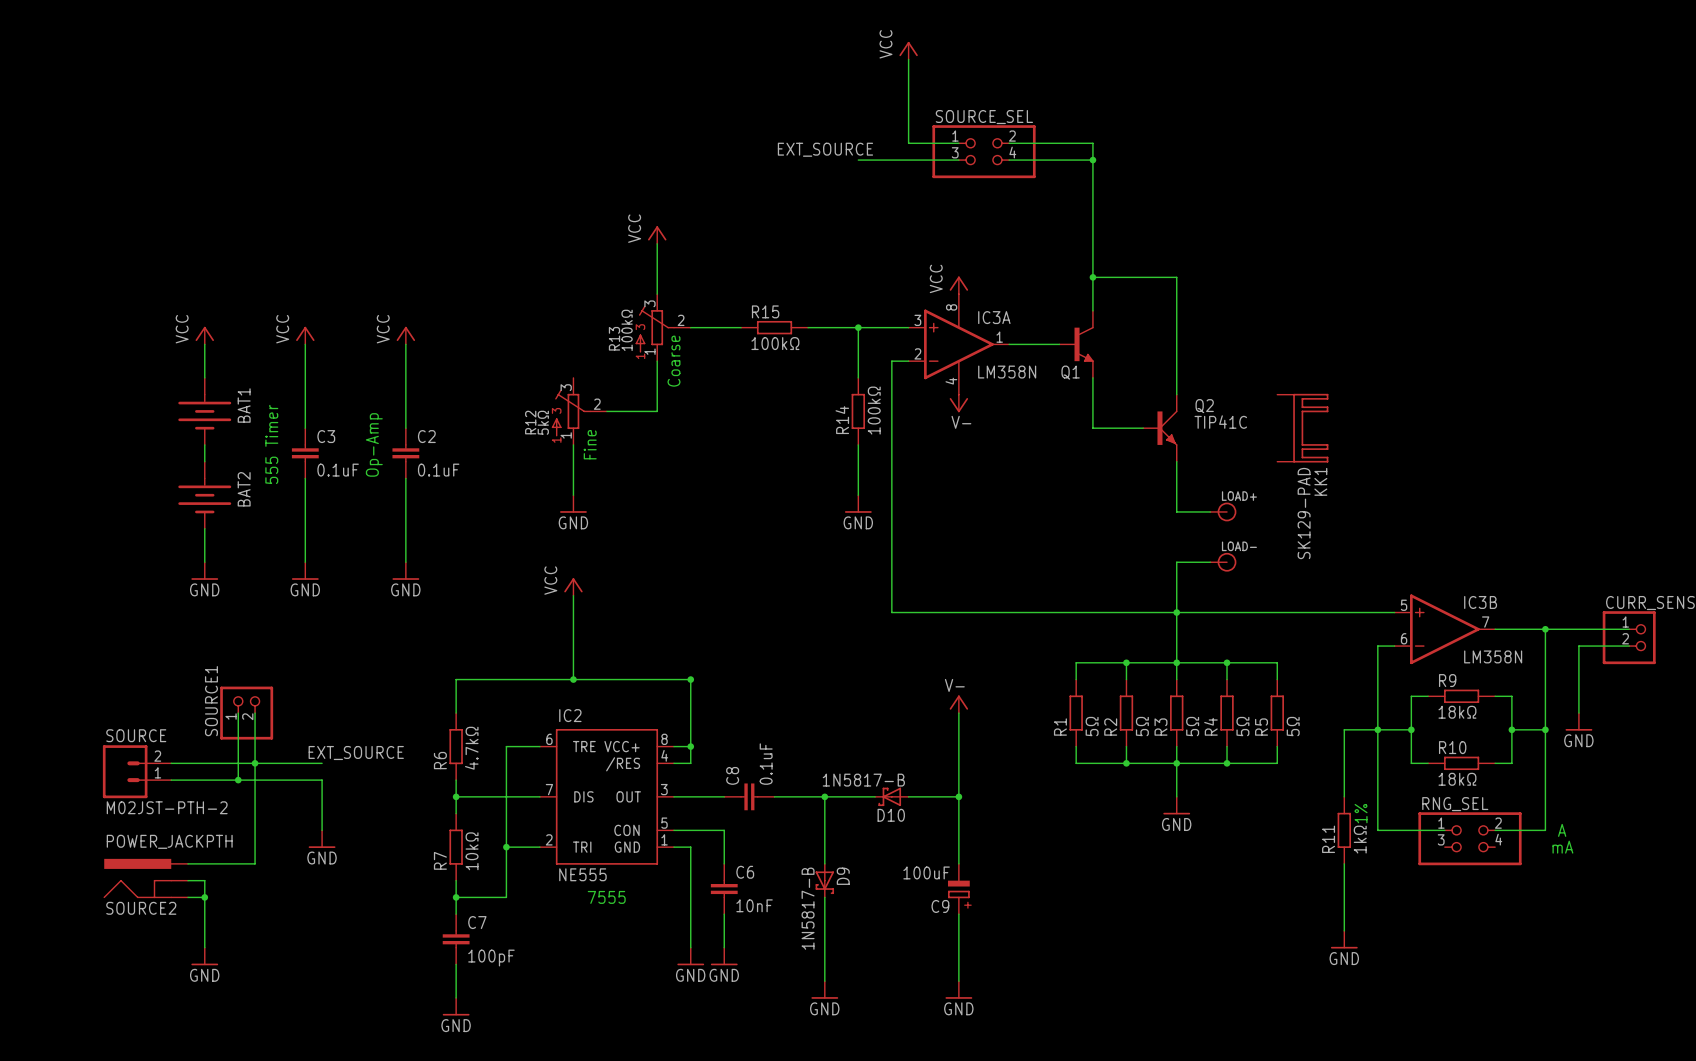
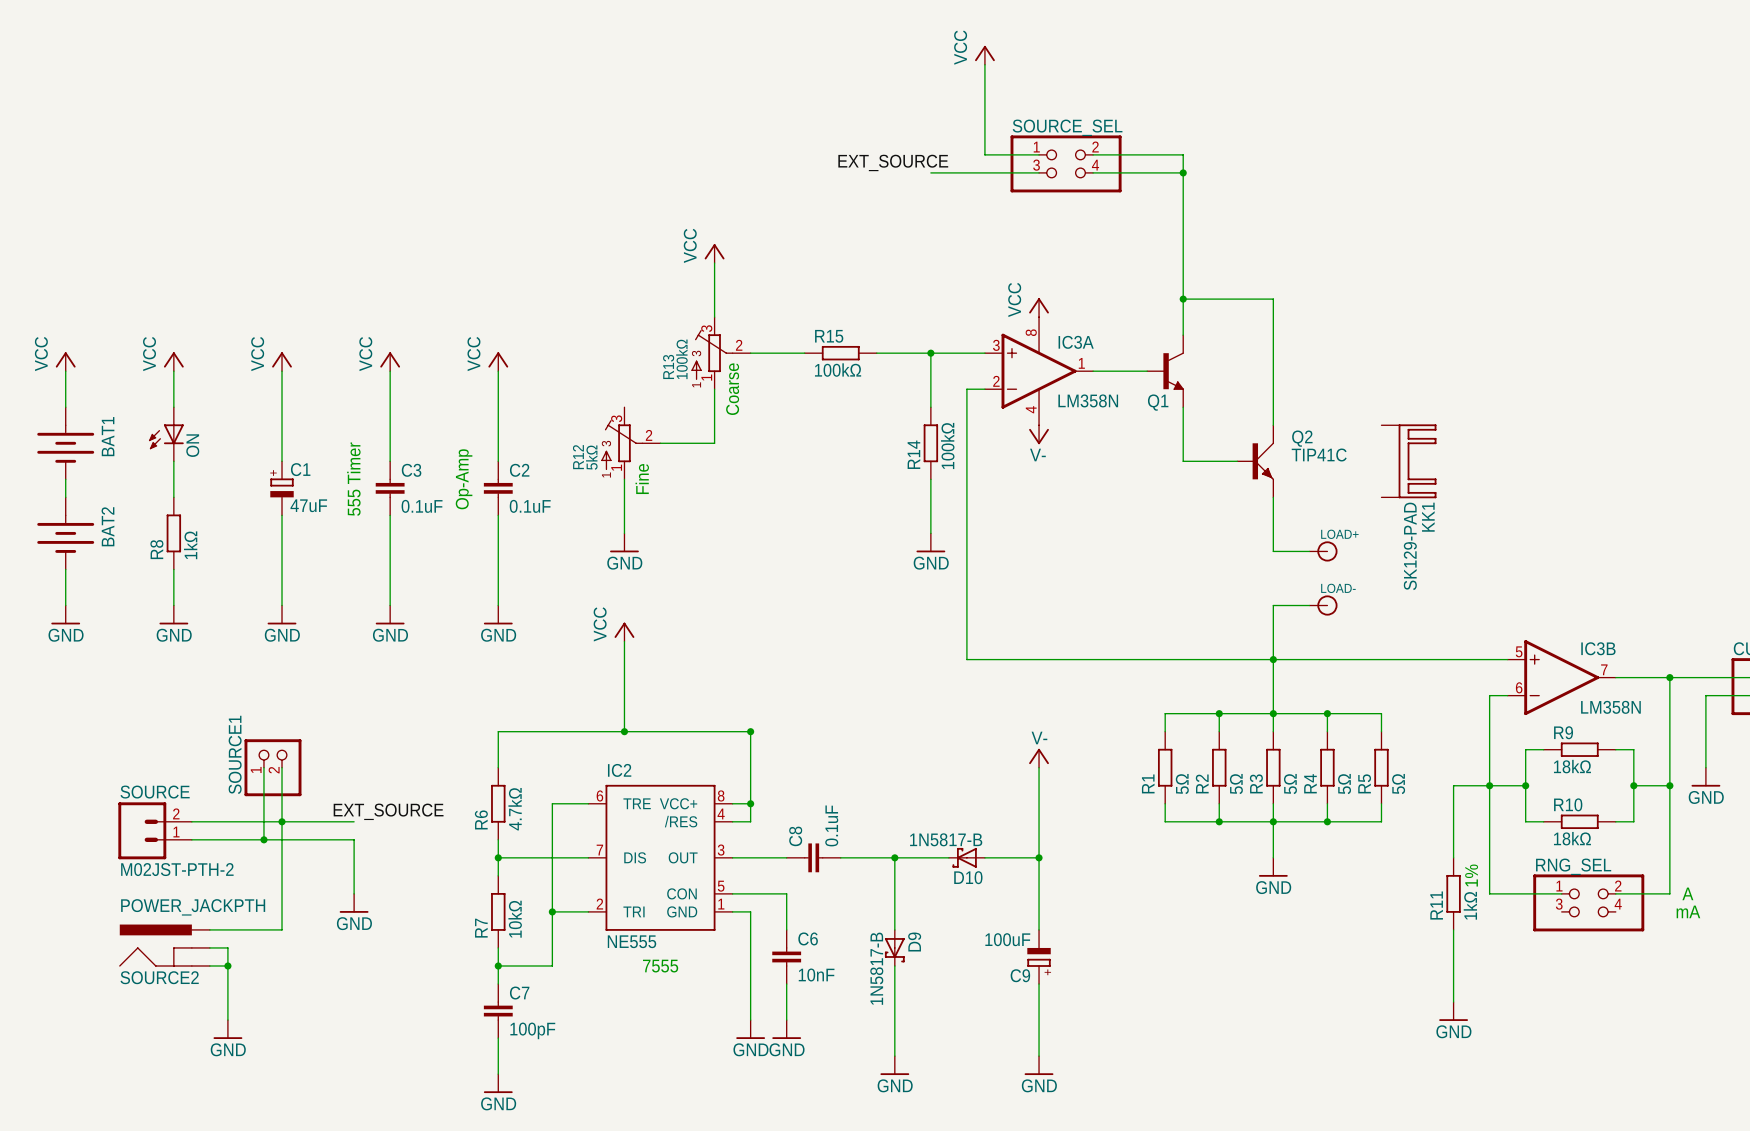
power symbol: none -> VCC (65, 361)
power symbol: none -> VCC (173, 361)
power symbol: VCC (204, 335) -> none
power symbol: none -> VCC (282, 361)
power symbol: VCC (305, 335) -> none
power symbol: none -> VCC (390, 361)
power symbol: VCC (405, 335) -> none
power symbol: none -> VCC (498, 361)
wire: none -> (65, 371) (65, 407)
wire: (204, 344) (204, 377) -> (173, 371) (173, 407)
wire: (305, 344) (305, 428) -> (282, 371) (282, 461)
wire: (405, 344) (405, 428) -> (390, 371) (390, 461)
wire: none -> (498, 371) (498, 461)
ON: none -> (166, 434)
BAT1 position: (204, 411) -> (65, 443)
wire: none -> (173, 461) (173, 497)
wire: (204, 444) (204, 461) -> (65, 479) (65, 497)
text position: 555 Timer (271, 444) -> 555 Timer (353, 479)
text position: Op-Amp (374, 444) -> Op-Amp (464, 479)
C1: none -> 47uF (282, 488)
C3 position: (305, 453) -> (390, 488)
C2 position: (405, 453) -> (498, 488)
wire: (305, 478) (305, 562) -> (282, 515) (282, 605)
wire: (405, 478) (405, 562) -> (390, 515) (390, 605)
wire: none -> (498, 515) (498, 605)
R8: none -> 1kΩ (173, 533)
BAT2 position: (204, 495) -> (65, 533)
wire: none -> (65, 569) (65, 605)
wire: (204, 528) (204, 562) -> (173, 569) (173, 605)
power symbol: none -> GND (65, 614)
power symbol: none -> GND (173, 614)
power symbol: GND (204, 571) -> none
power symbol: none -> GND (282, 614)
power symbol: GND (305, 571) -> none
power symbol: none -> GND (390, 614)
power symbol: GND (405, 571) -> none
power symbol: none -> GND (498, 614)

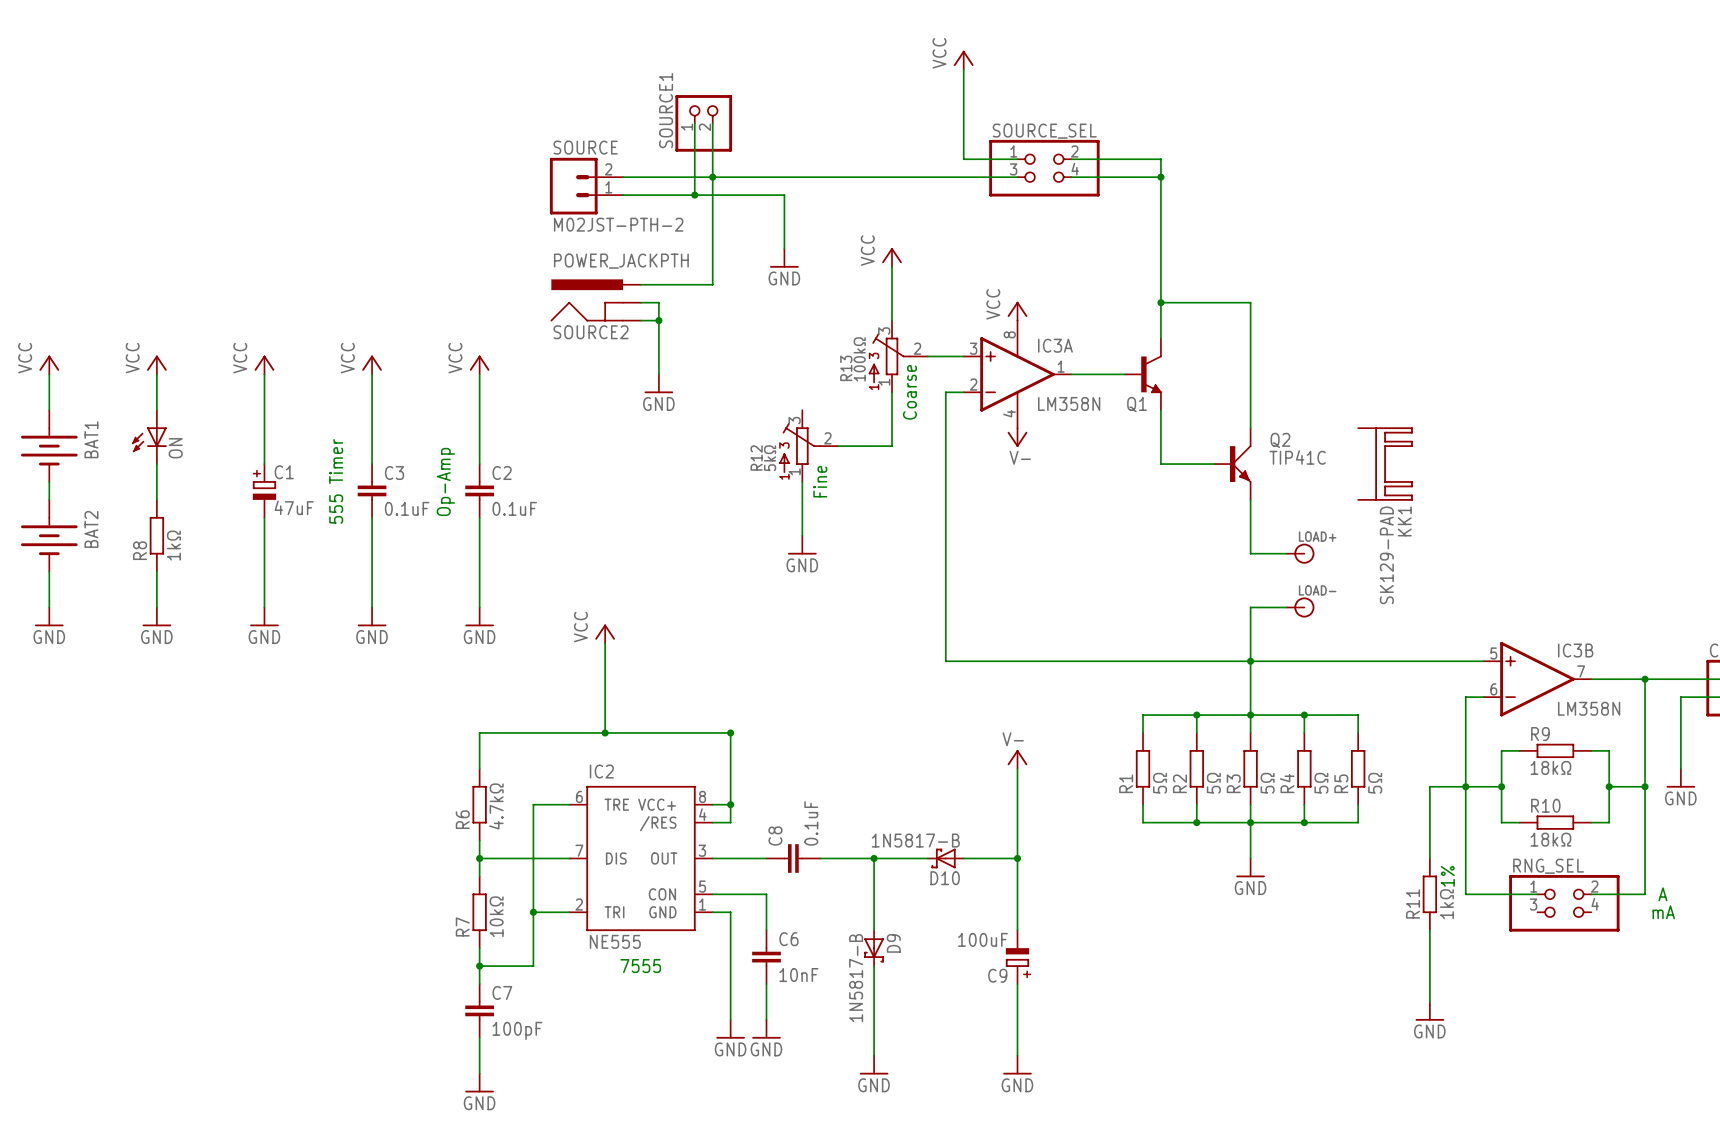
wire: none -> (694, 123) (694, 195)
wire: none -> (712, 123) (712, 284) (640, 284)
label: EXT_SOURCE (893, 162) -> none
wire: none -> (623, 177) (909, 177)
junction: none -> (712, 177)
SOURCE: none -> M02JST-PTH-2 (586, 186)
wire: none -> (623, 195) (784, 195) (784, 248)
junction: none -> (694, 195)
power symbol: VCC (714, 253) -> none
power symbol: none -> VCC (892, 257)
power symbol: none -> GND (784, 258)
wire: (714, 263) (714, 317) -> none
wire: none -> (640, 302) (658, 302) (658, 374)
wire: none -> (640, 320) (658, 320)
junction: none -> (658, 320)
R13 position: (721, 353) -> (898, 356)
wire: (750, 353) (804, 353) -> none
R15: 100kΩ (840, 353) -> none
wire: (876, 353) (948, 353) -> none
wire: (930, 353) (930, 407) -> (892, 266) (892, 320)
junction: (930, 353) -> none
power symbol: none -> GND (658, 383)
wire: (714, 389) (714, 443) (660, 443) -> none
text: Coarse (732, 389) -> none
wire: none -> (892, 392) (892, 446) (838, 446)
text: none -> Coarse (909, 392)
R12 position: (630, 443) -> (808, 446)
R14: 100kΩ (930, 443) -> none
wire: (624, 479) (624, 533) -> none
text: Fine (642, 479) -> none
text: none -> Fine (820, 481)
wire: (930, 479) (930, 533) -> (802, 481) (802, 535)
power symbol: GND (624, 542) -> none
power symbol: none -> GND (802, 545)
power symbol: GND (930, 542) -> none
wire: (263, 767) (263, 839) -> none
SOURCE1 position: (272, 767) -> (703, 123)
wire: (282, 767) (282, 929) (209, 929) -> none
label: EXT_SOURCE (388, 811) -> none
wire: (191, 821) (354, 821) -> none
junction: (282, 821) -> none
SOURCE: M02JST-PTH-2 (155, 830) -> none
wire: (191, 839) (354, 839) (354, 893) -> none
junction: (263, 839) -> none
power symbol: GND (354, 903) -> none
SOURCE2 position: (164, 945) -> (595, 300)
wire: (209, 947) (227, 947) (227, 1020) -> none
wire: (209, 965) (227, 965) -> none
junction: (227, 965) -> none
power symbol: GND (227, 1029) -> none

